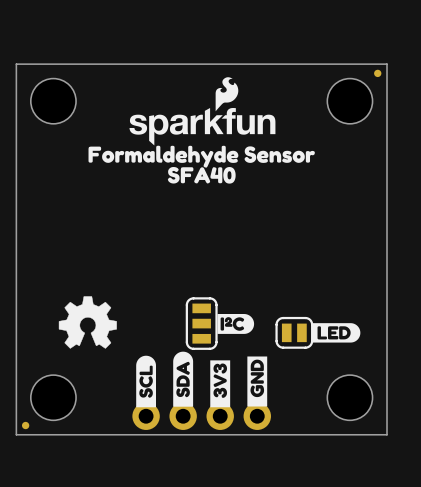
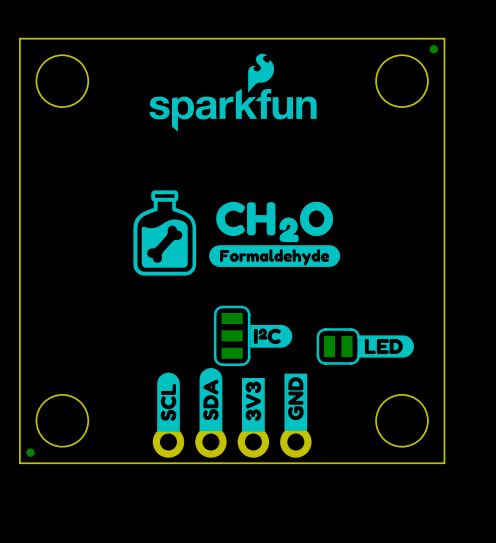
drawing: [88, 145, 315, 184] -> none
drawing: none -> [133, 190, 341, 276]
drawing: [58, 296, 117, 349] -> none

